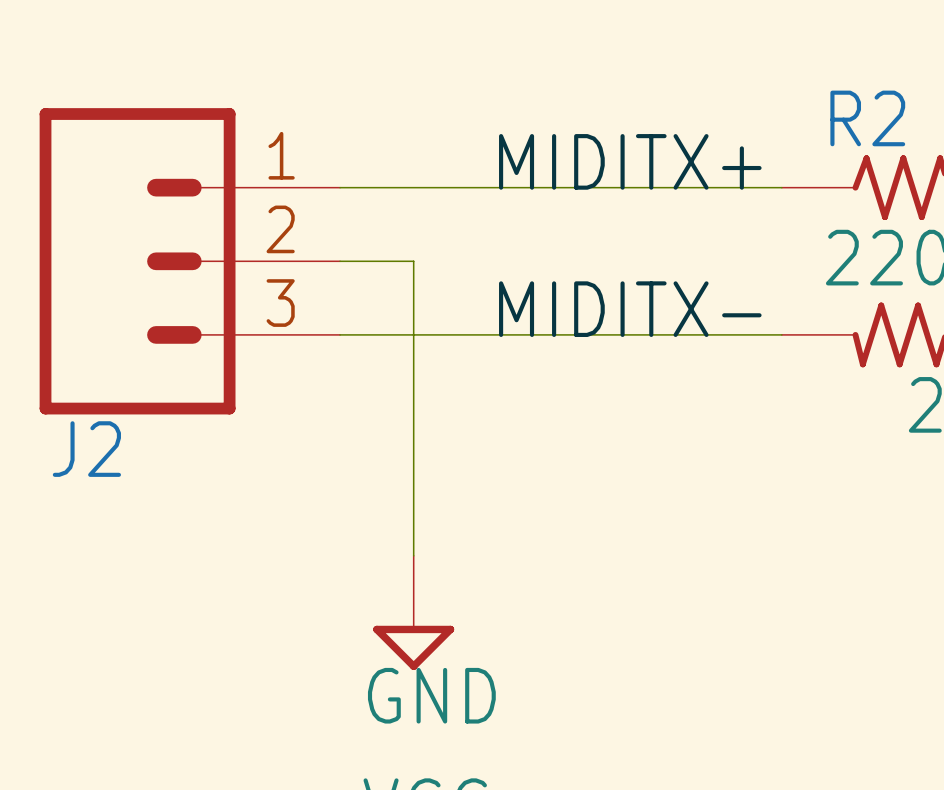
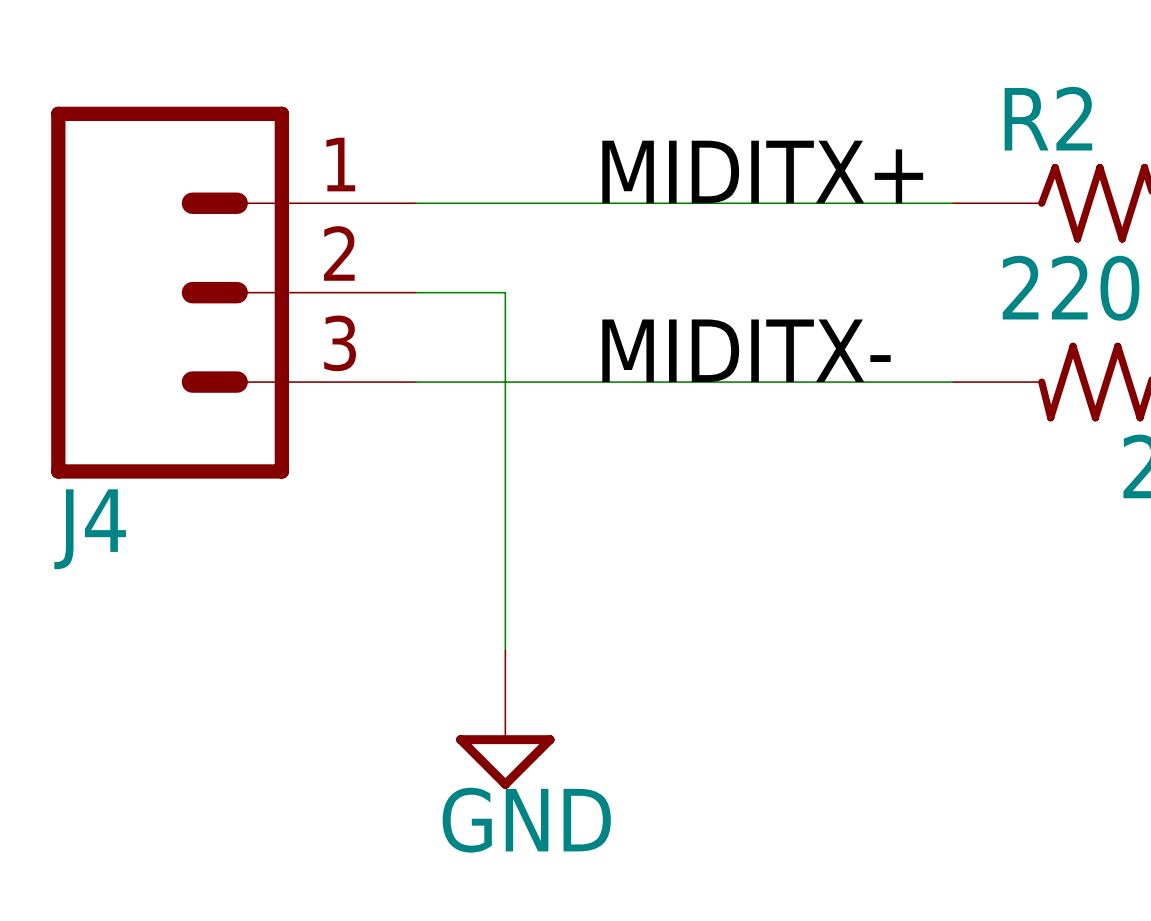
J2 name: J2 (86, 449) -> J4 (90, 529)

